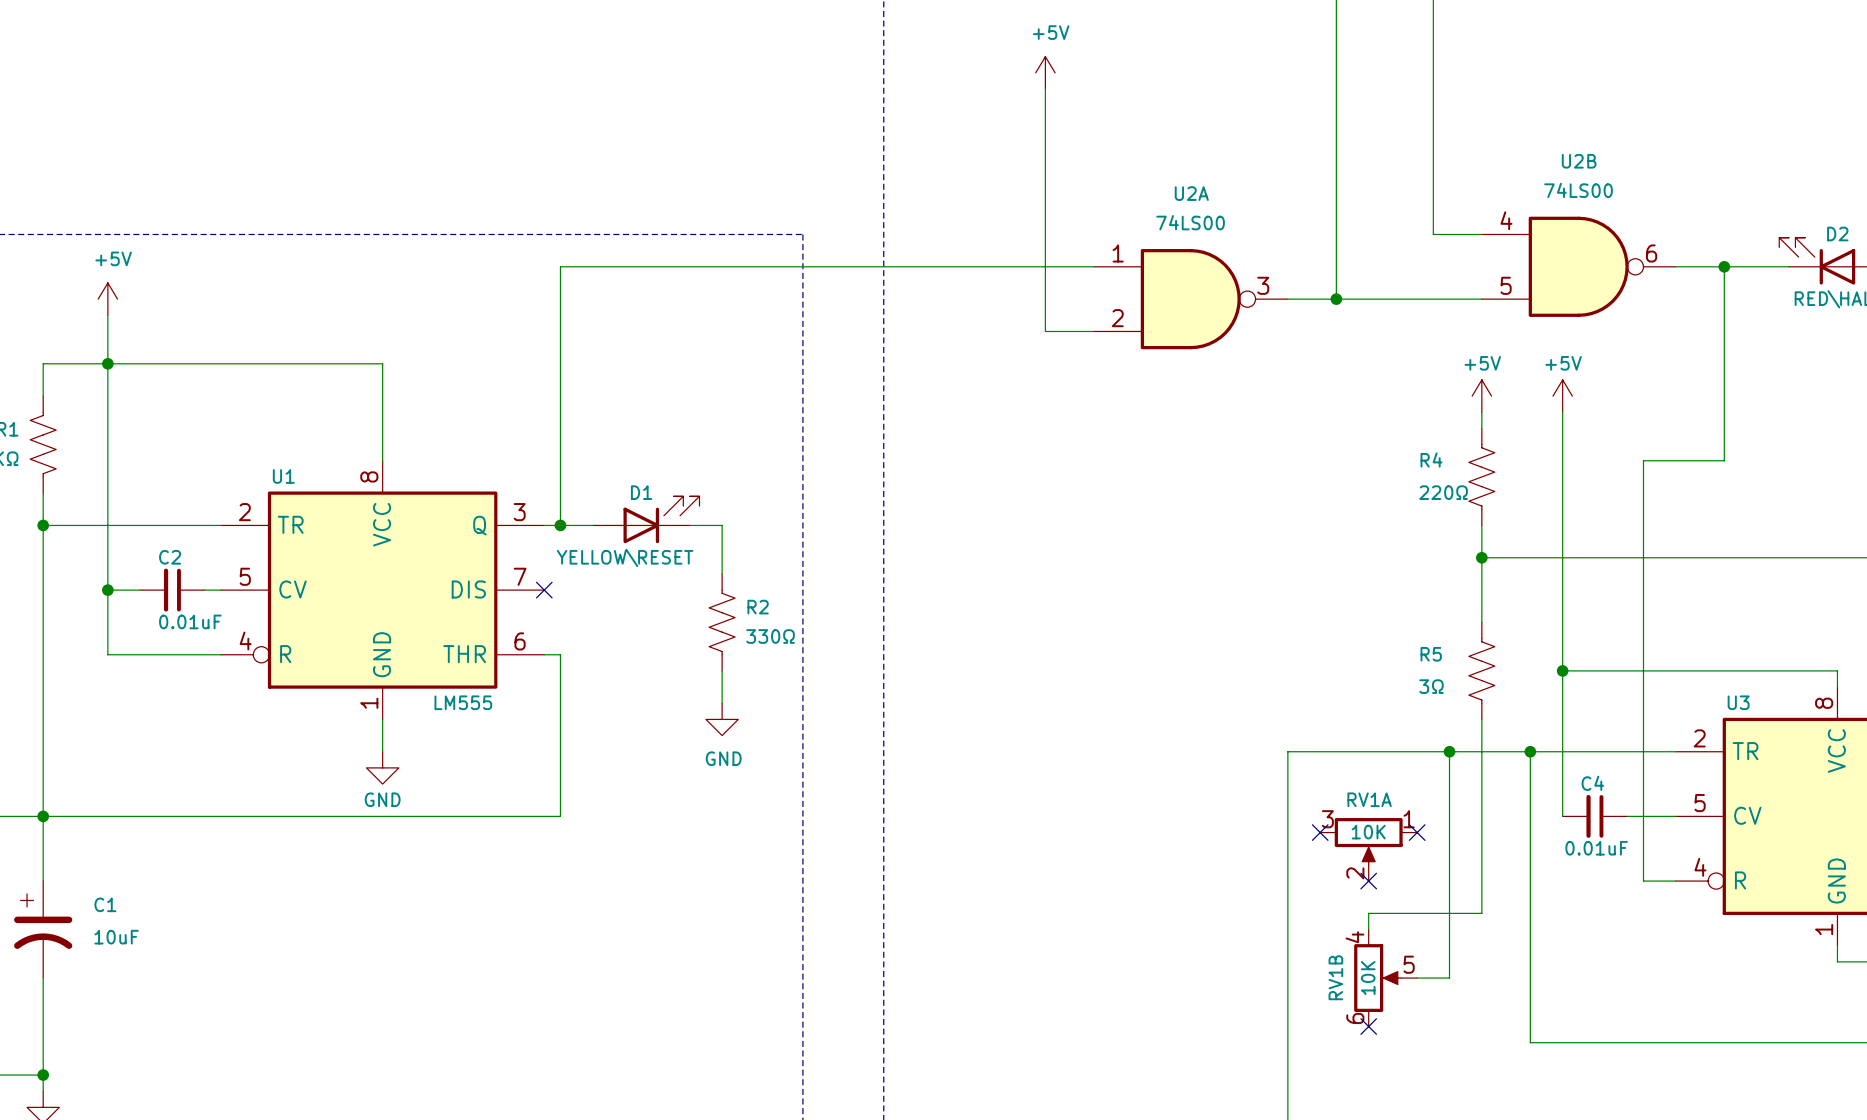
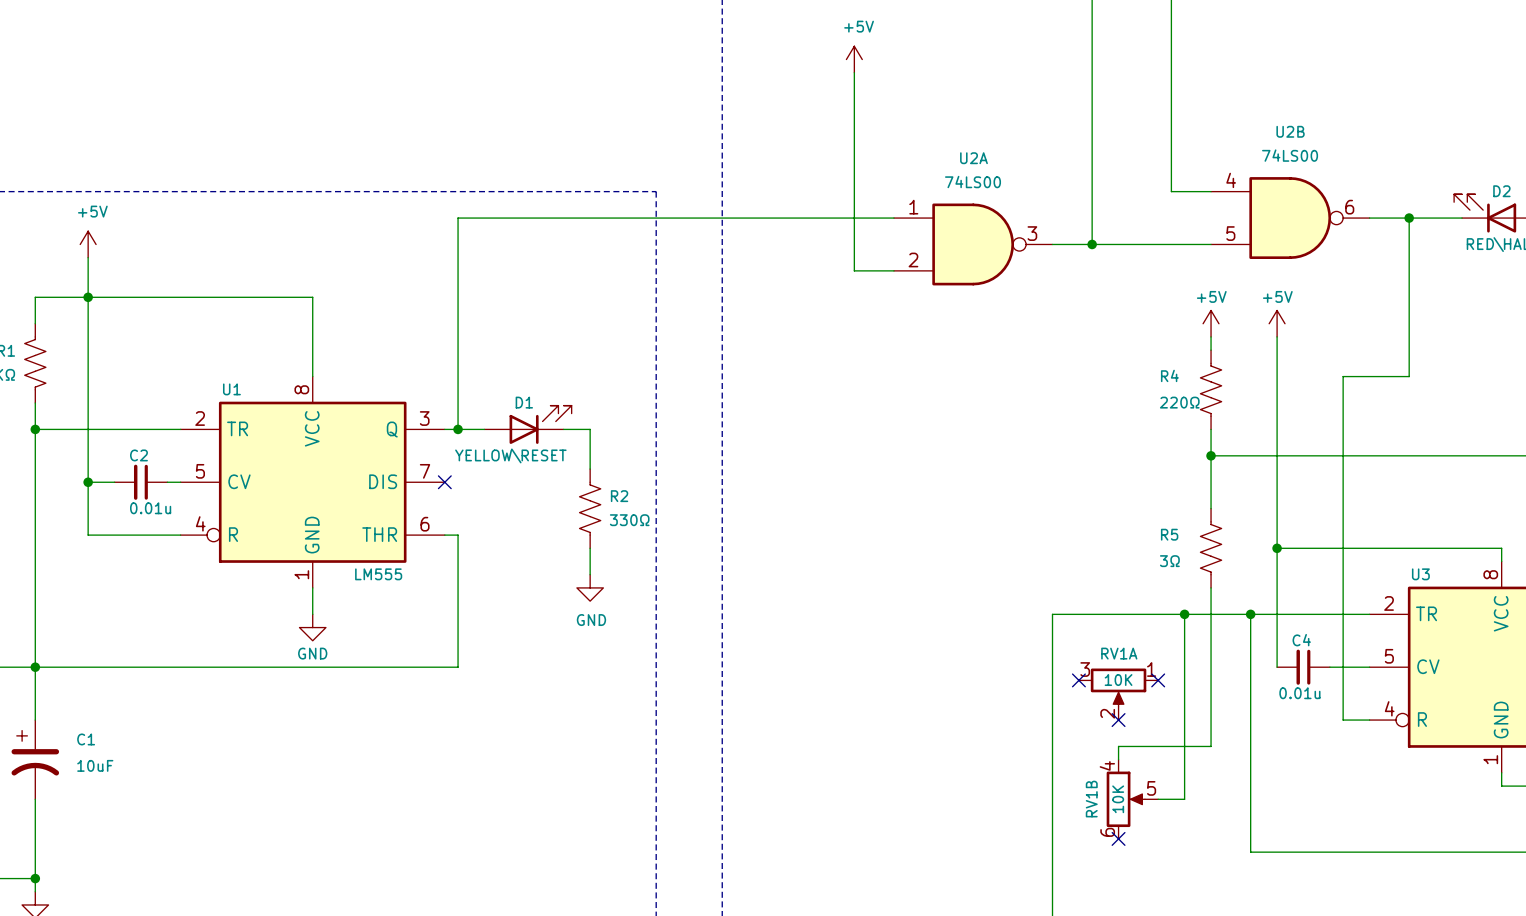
C2 value: 0.01uF (190, 621) -> 0.01u (150, 508)
C4 value: 0.01uF (1596, 848) -> 0.01u (1299, 693)

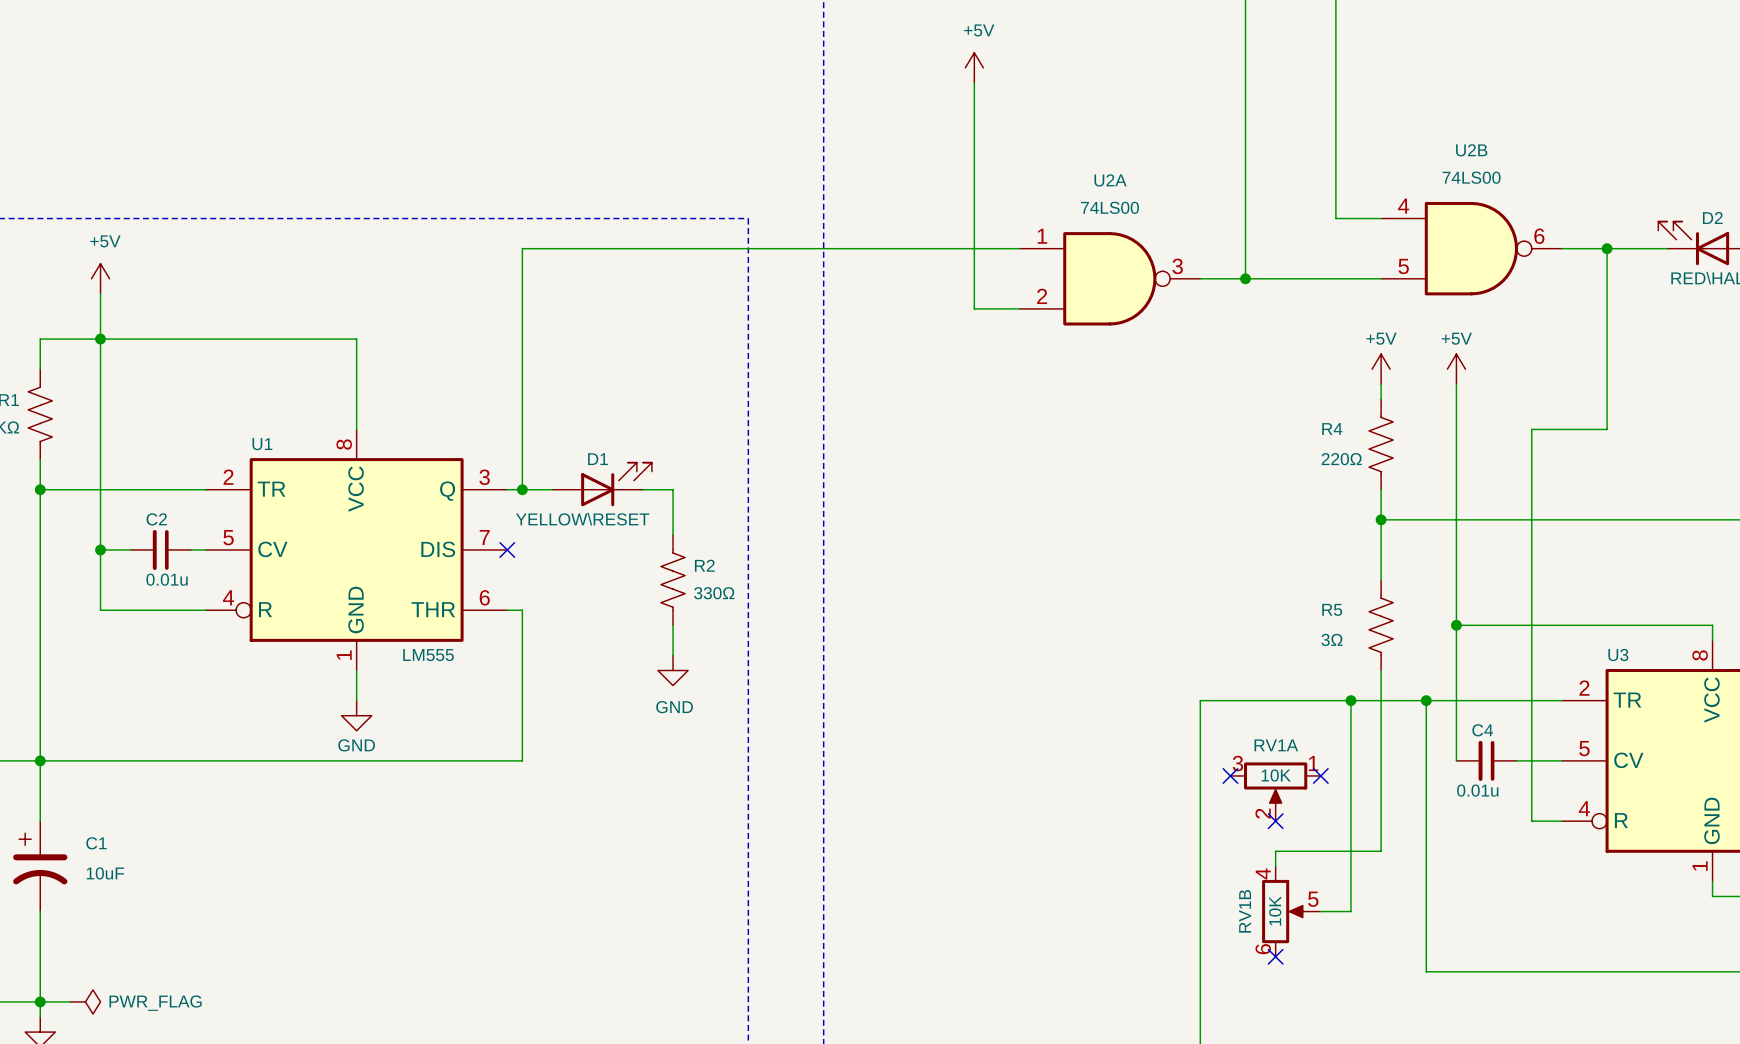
wire: none -> (40, 1001) (70, 1001)
power symbol: none -> PWR_FLAG (85, 1001)

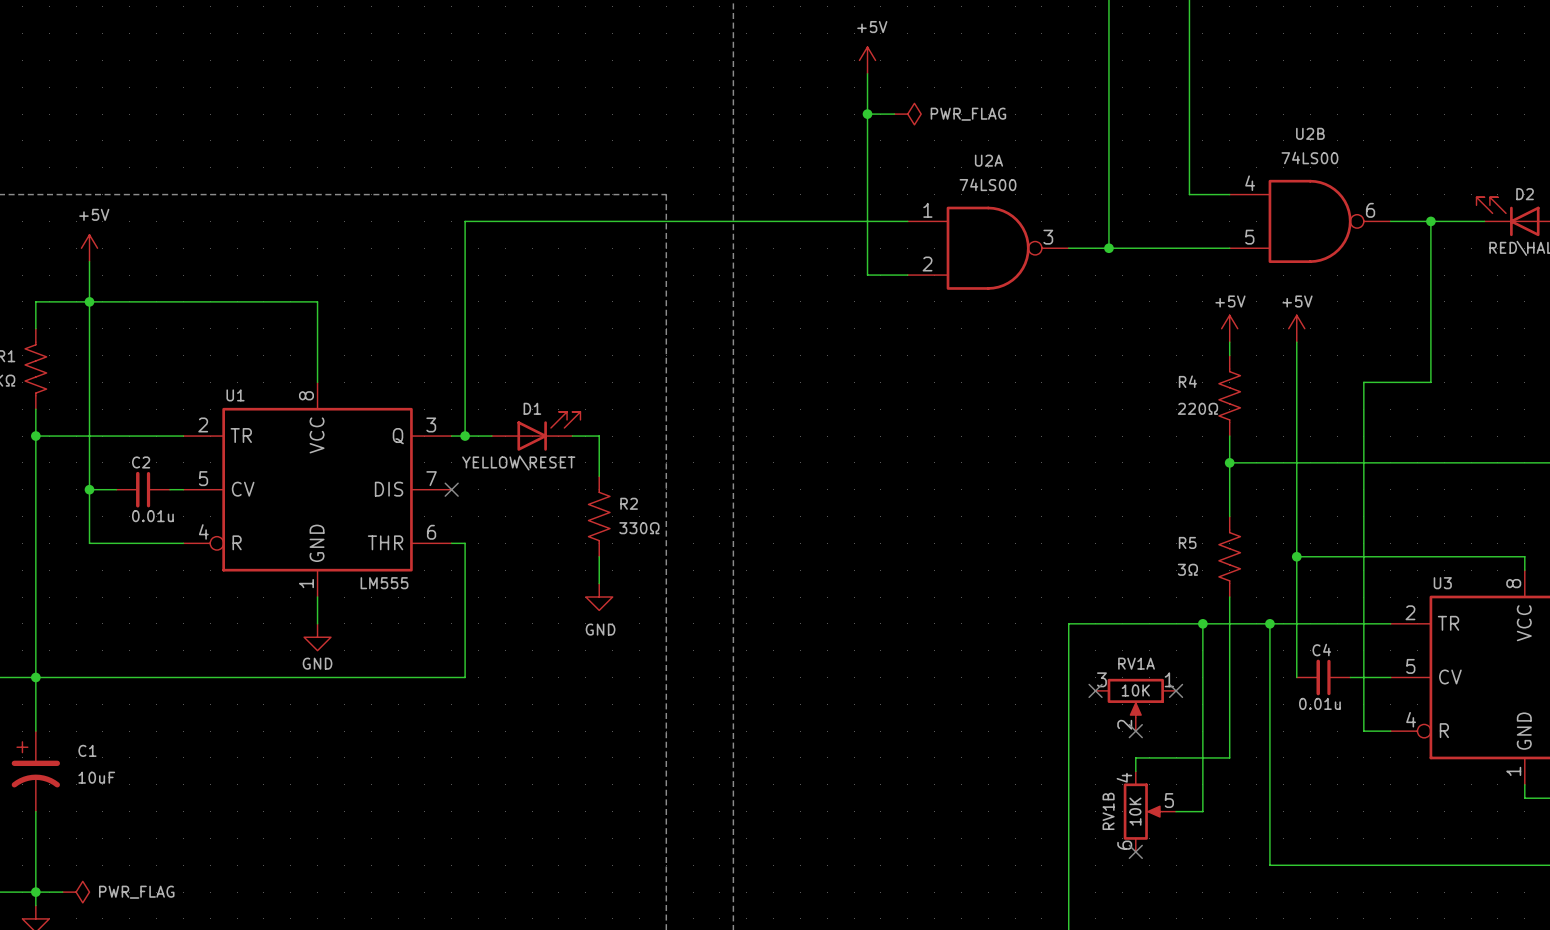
wire: none -> (867, 114) (894, 114)
junction: none -> (867, 114)
power symbol: none -> PWR_FLAG (907, 114)

